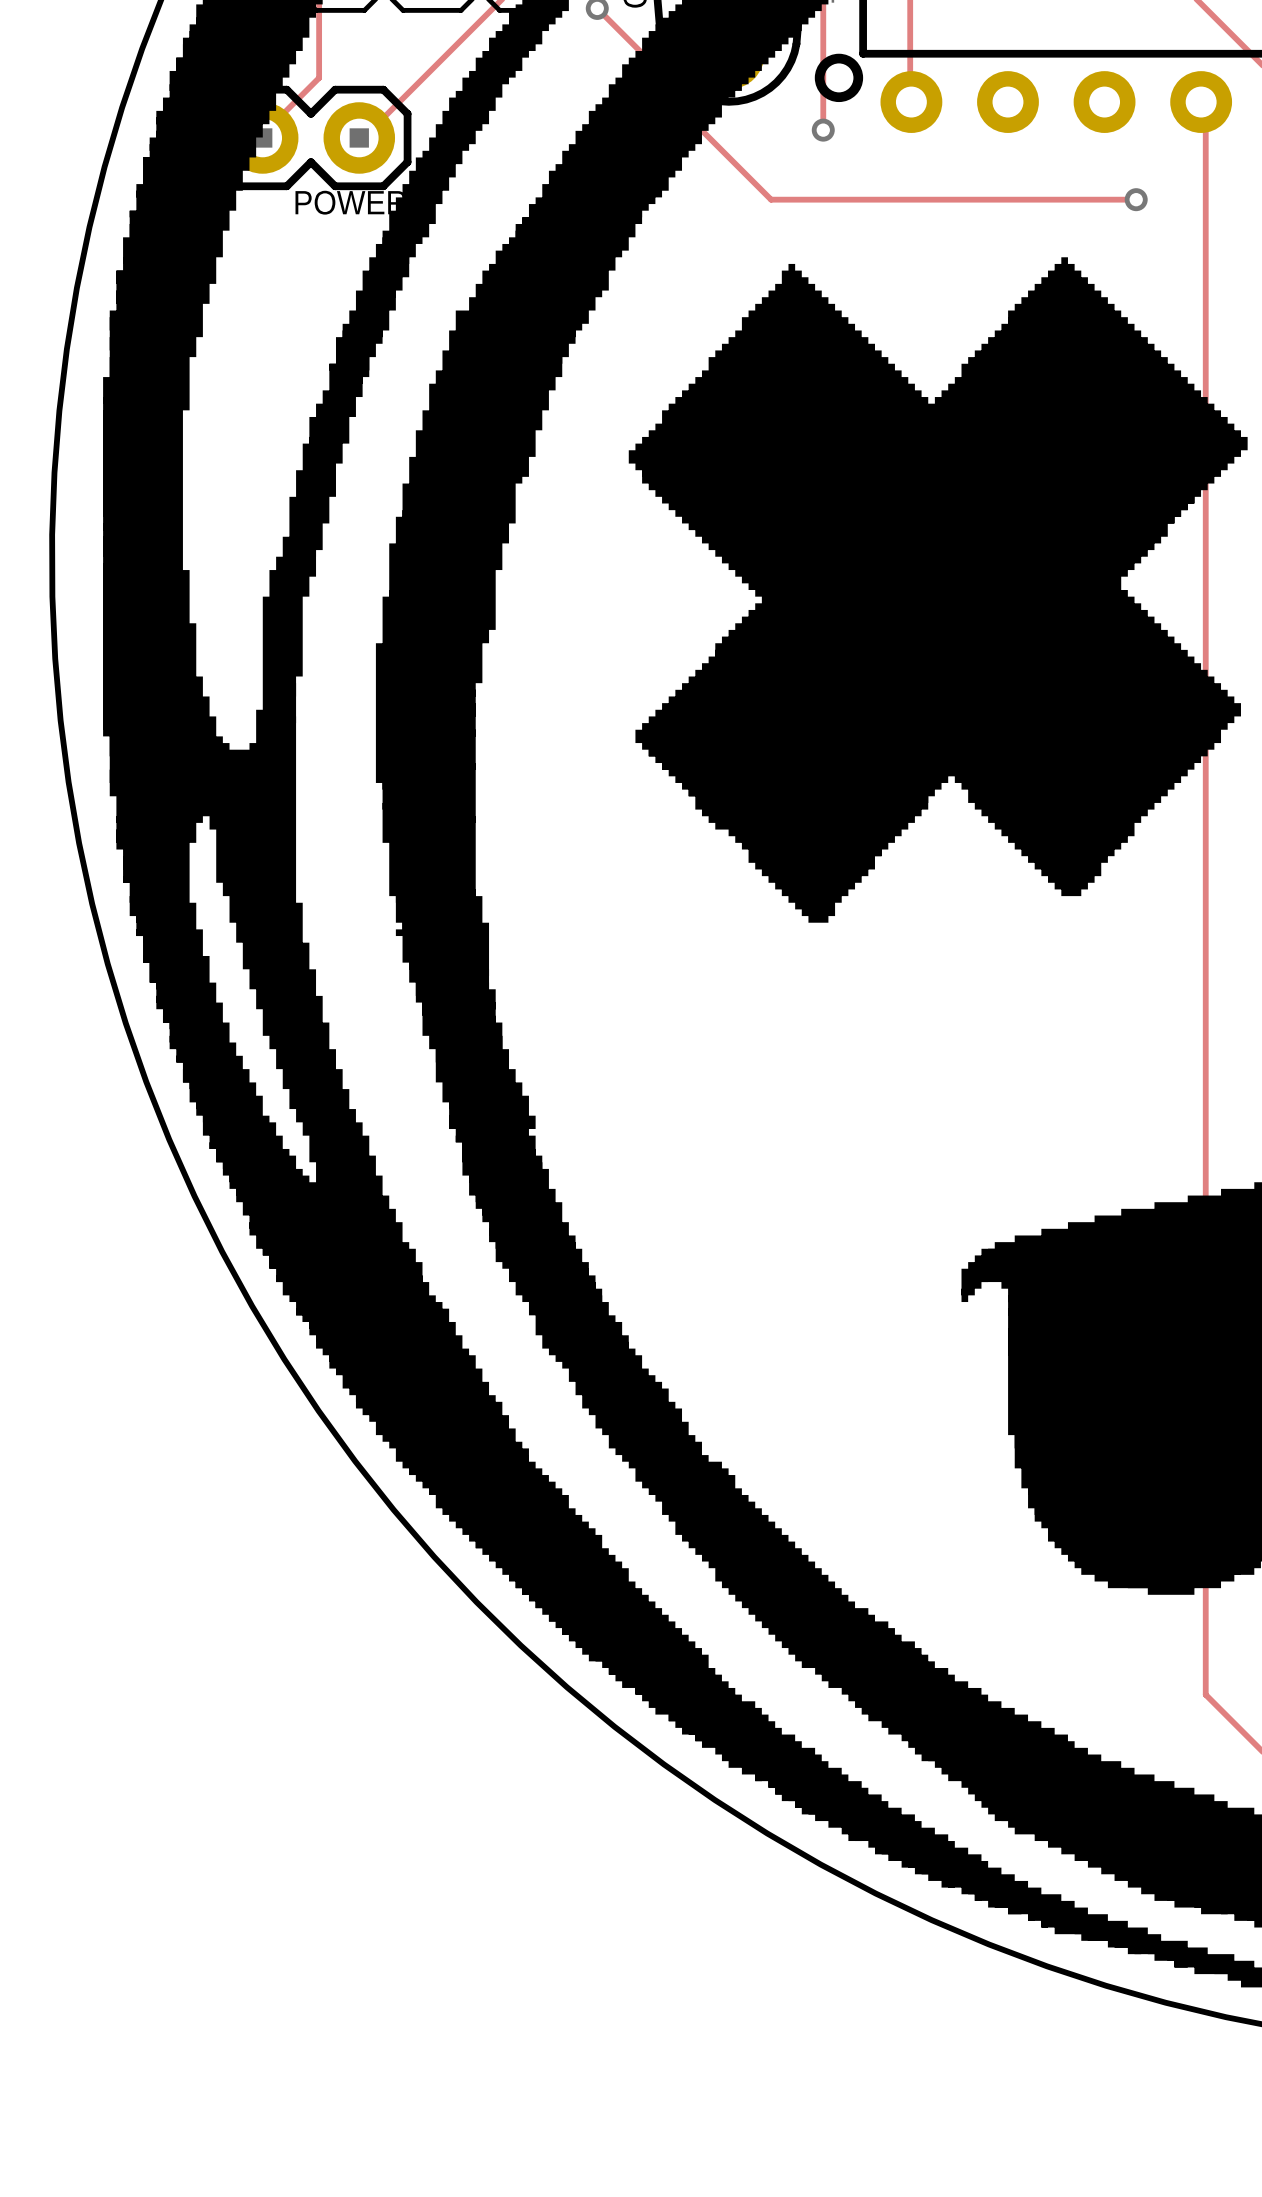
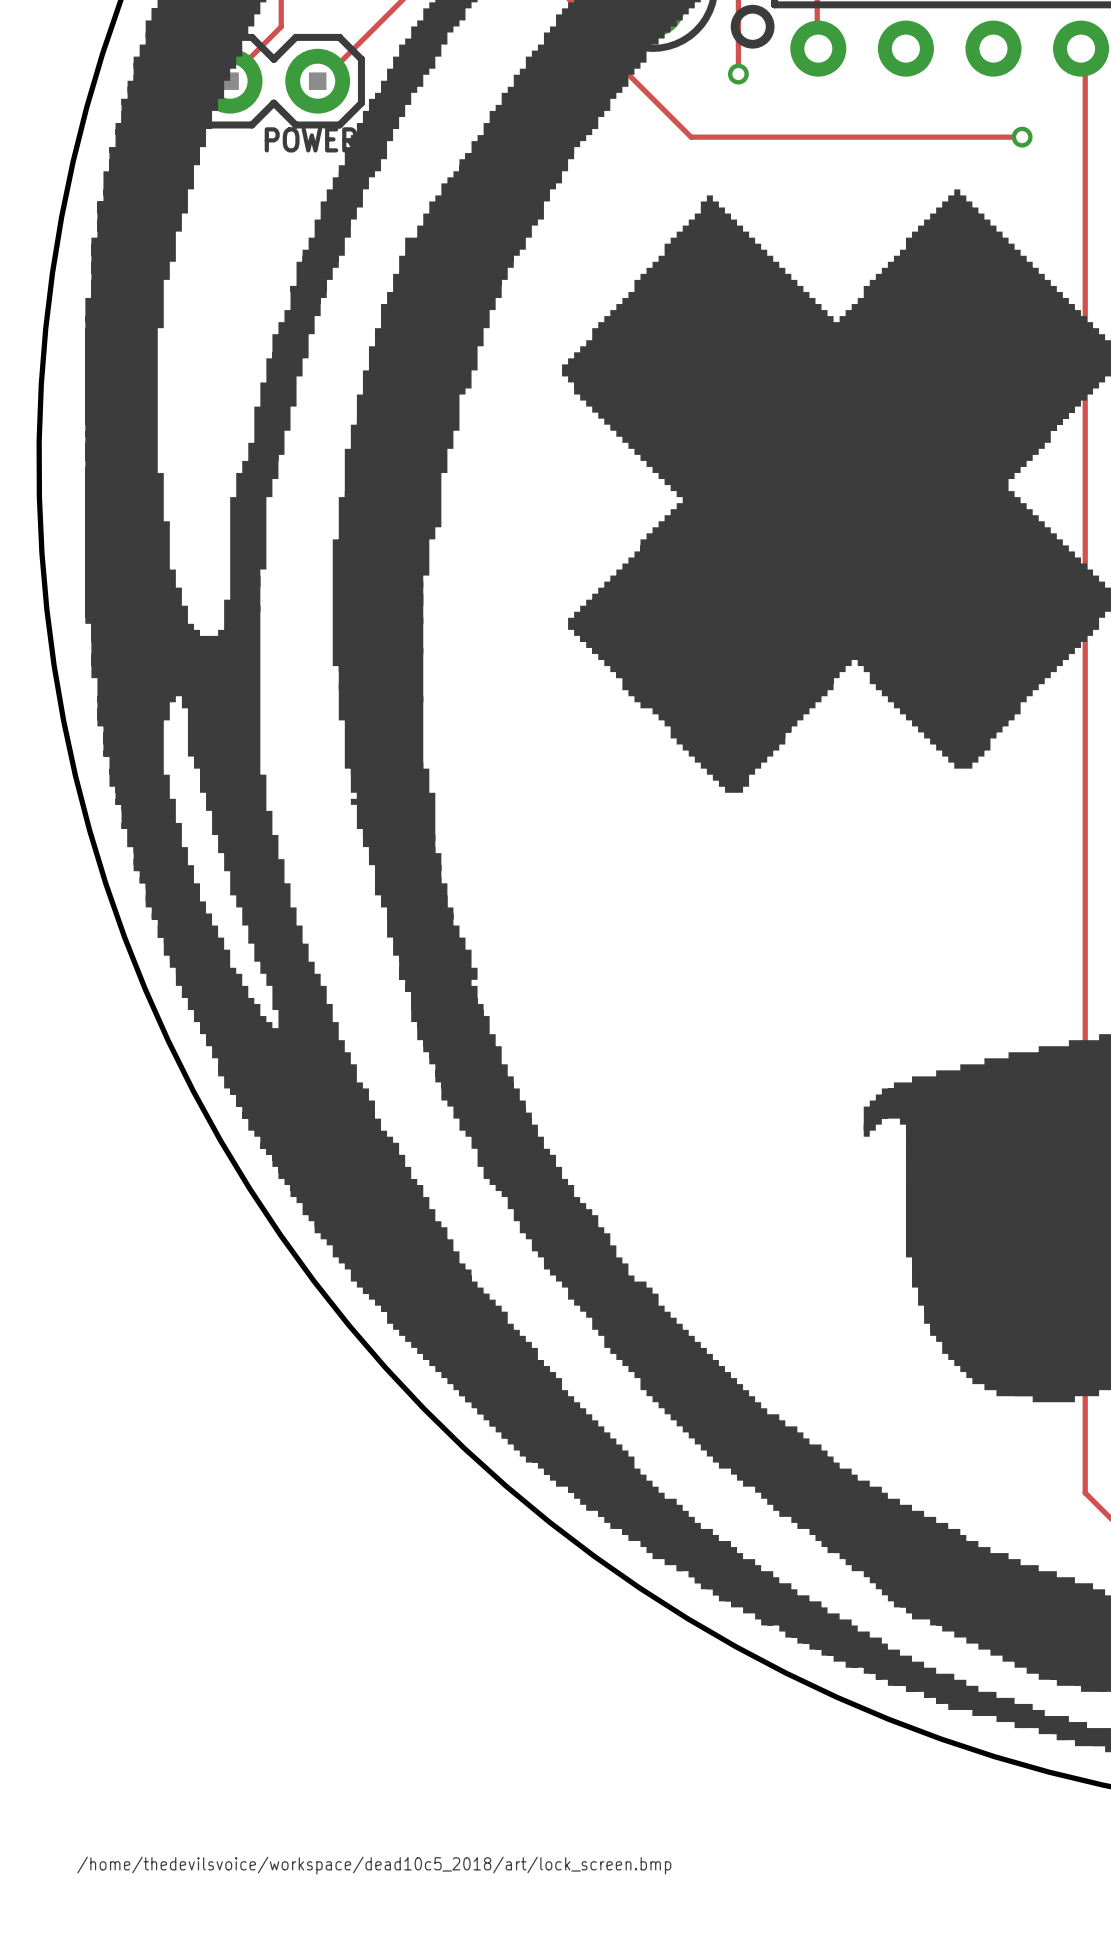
text: none -> /home/thedevilsvoice/workspace/dead10c5_2018/art/lock_screen.bmp (374, 1865)

